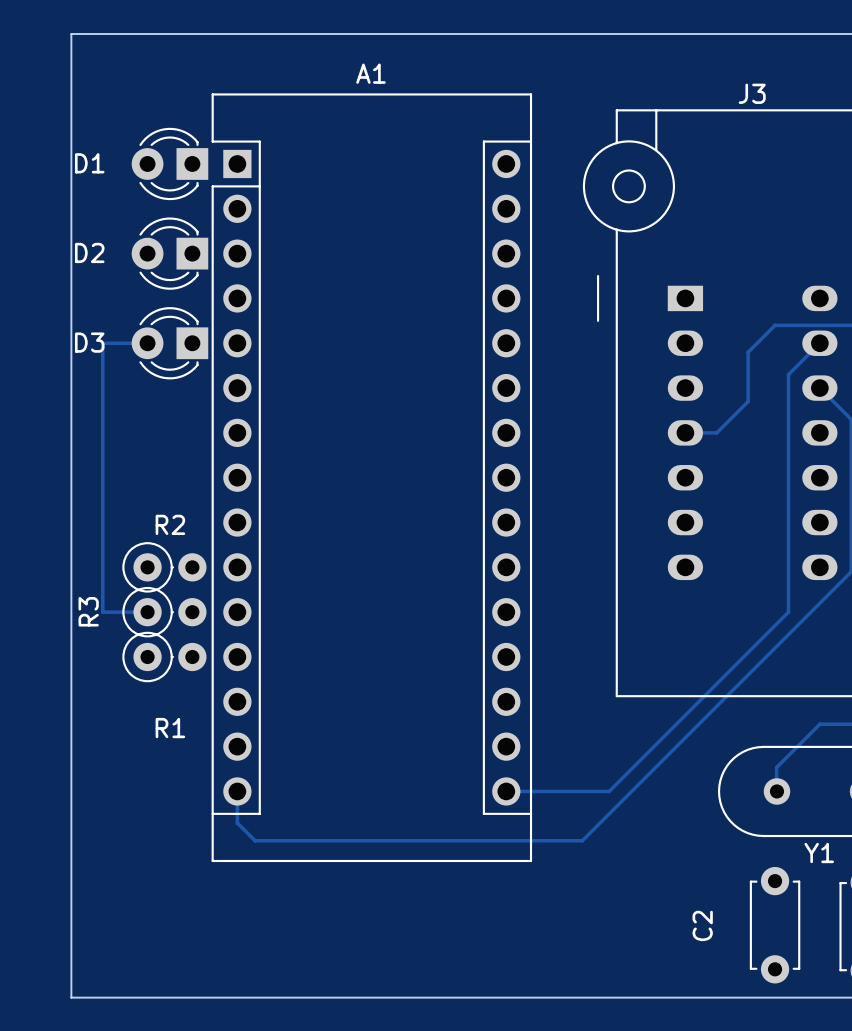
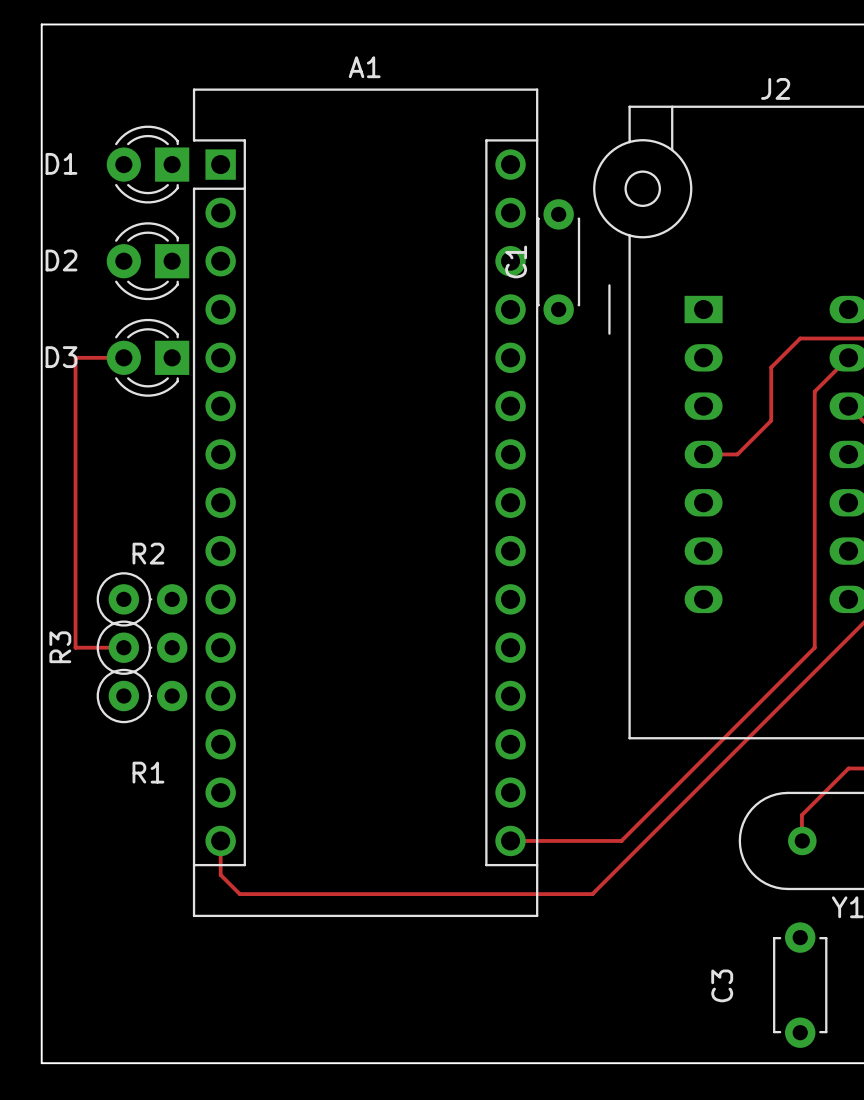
J3 name: J3 (752, 93) -> J2 (775, 88)
C1: none -> (558, 261)
C2 name: C2 (702, 925) -> C3 (722, 985)

